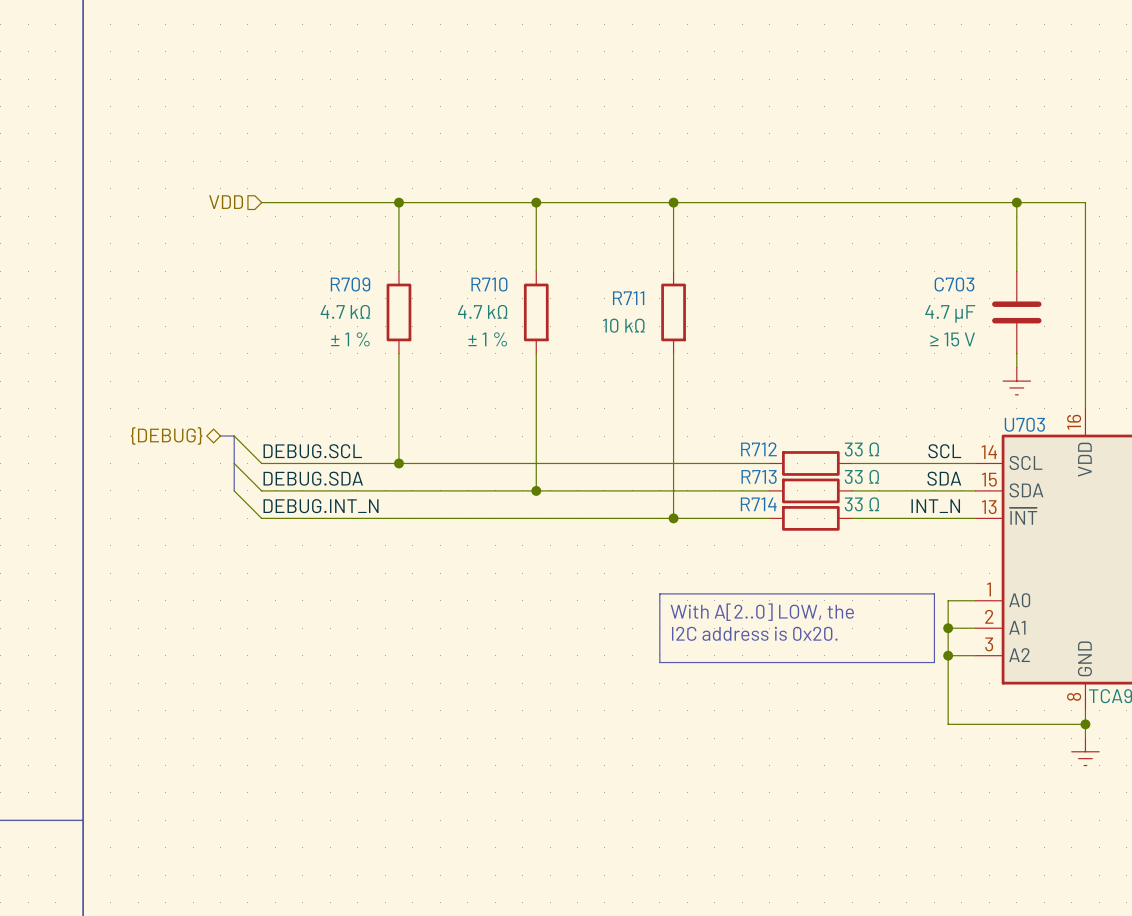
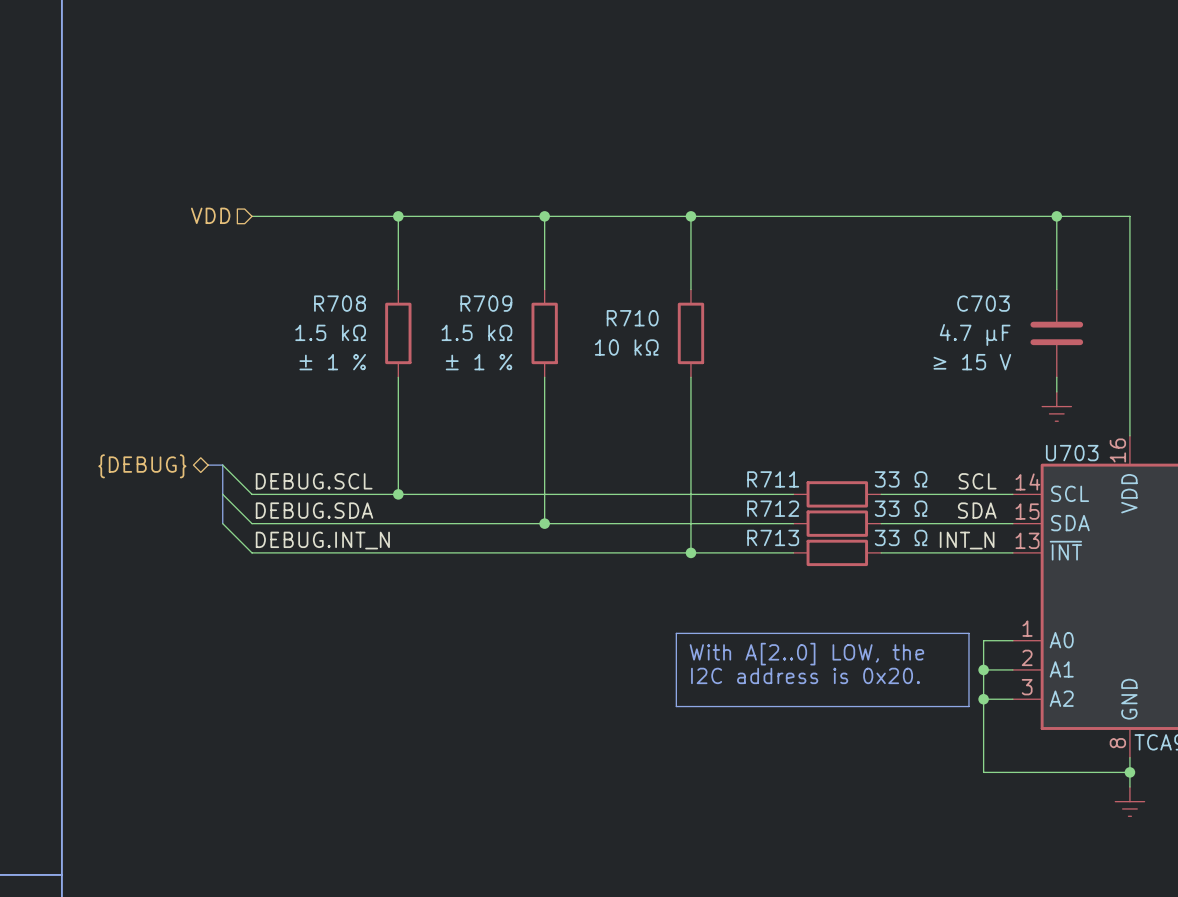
R709 name: R709 (350, 284) -> R708 (340, 303)
R710 name: R710 (489, 284) -> R709 (486, 303)
R711 name: R711 (628, 298) -> R710 (632, 318)
R709 value: 4.7 kΩ (345, 311) -> 1.5 kΩ (330, 332)
R710 value: 4.7 kΩ (482, 311) -> 1.5 kΩ (476, 332)
R712 name: R712 (758, 449) -> R711 (773, 479)
R713 name: R713 (759, 476) -> R712 (773, 508)
R714 name: R714 (758, 504) -> R713 (773, 537)

